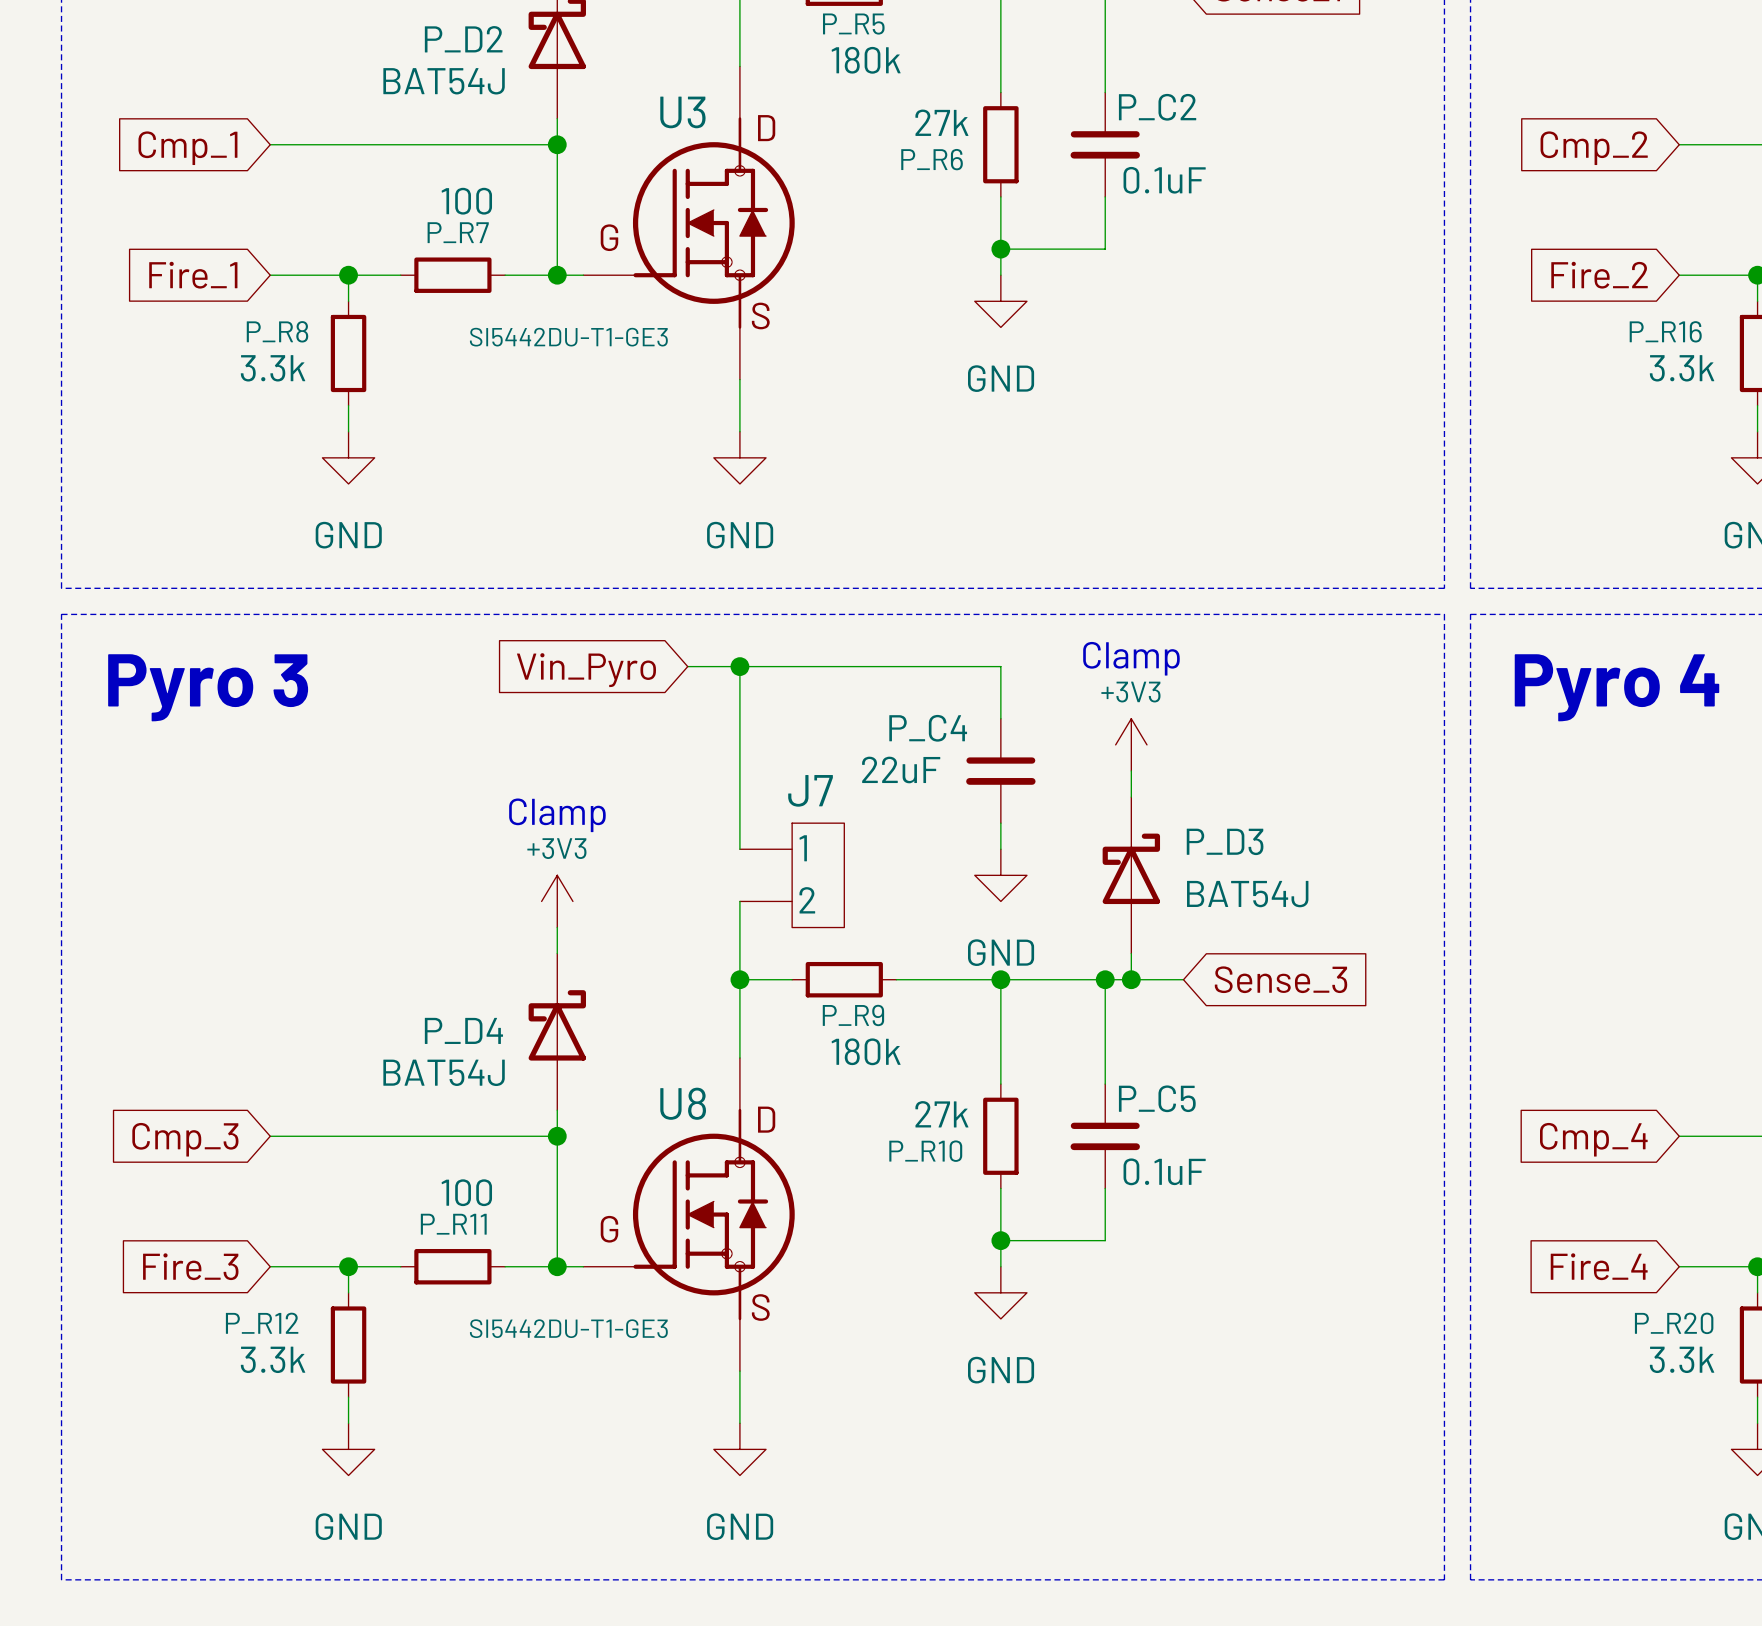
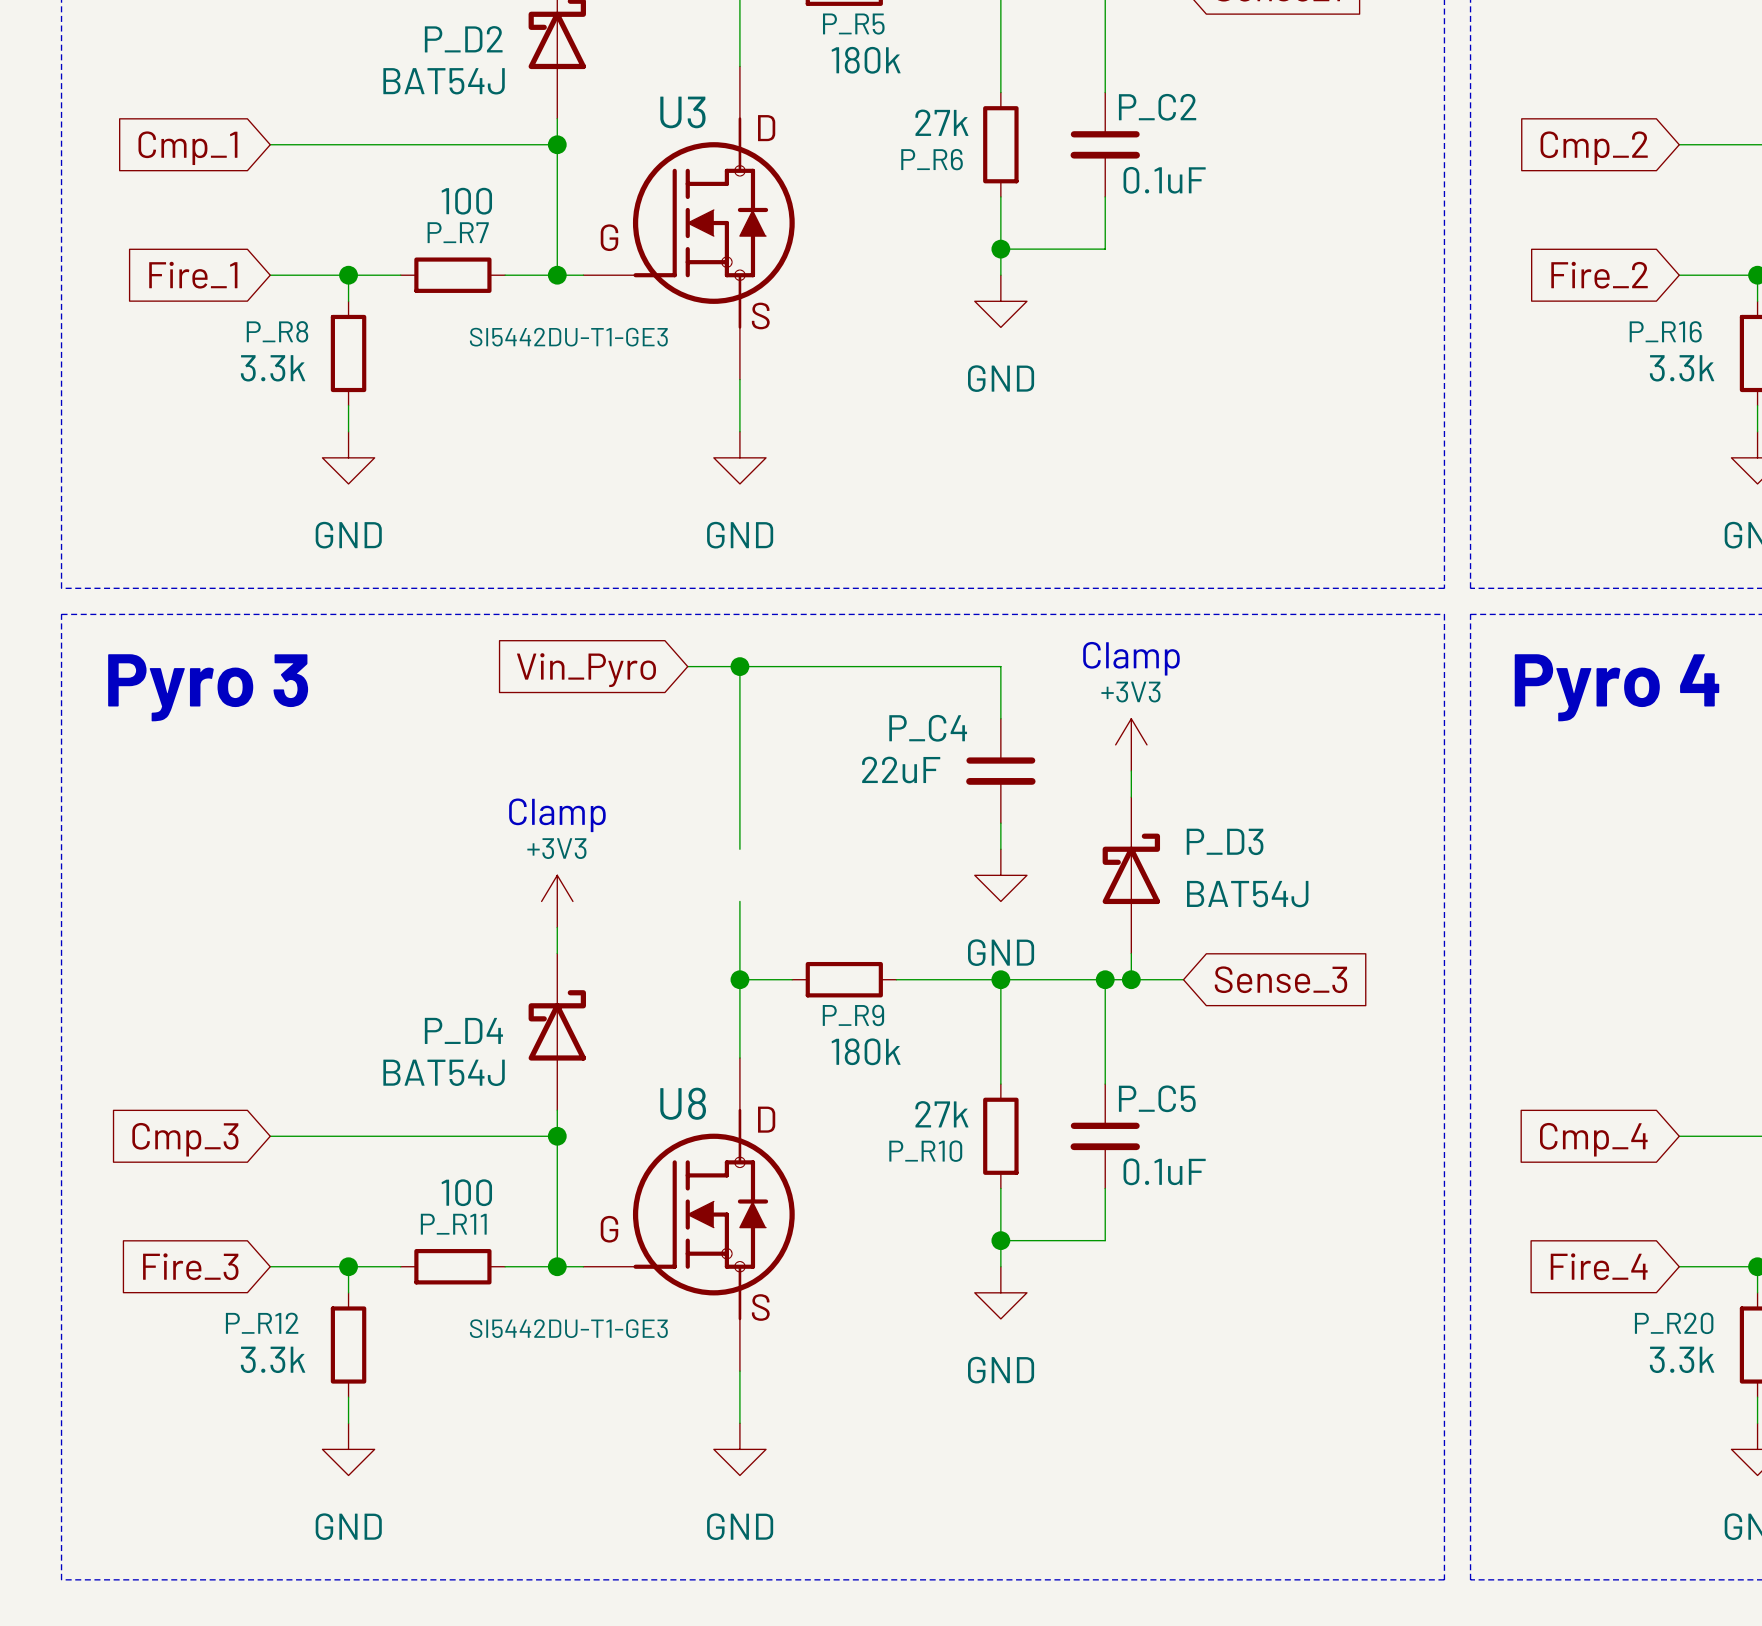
J7: (792, 875) -> none

